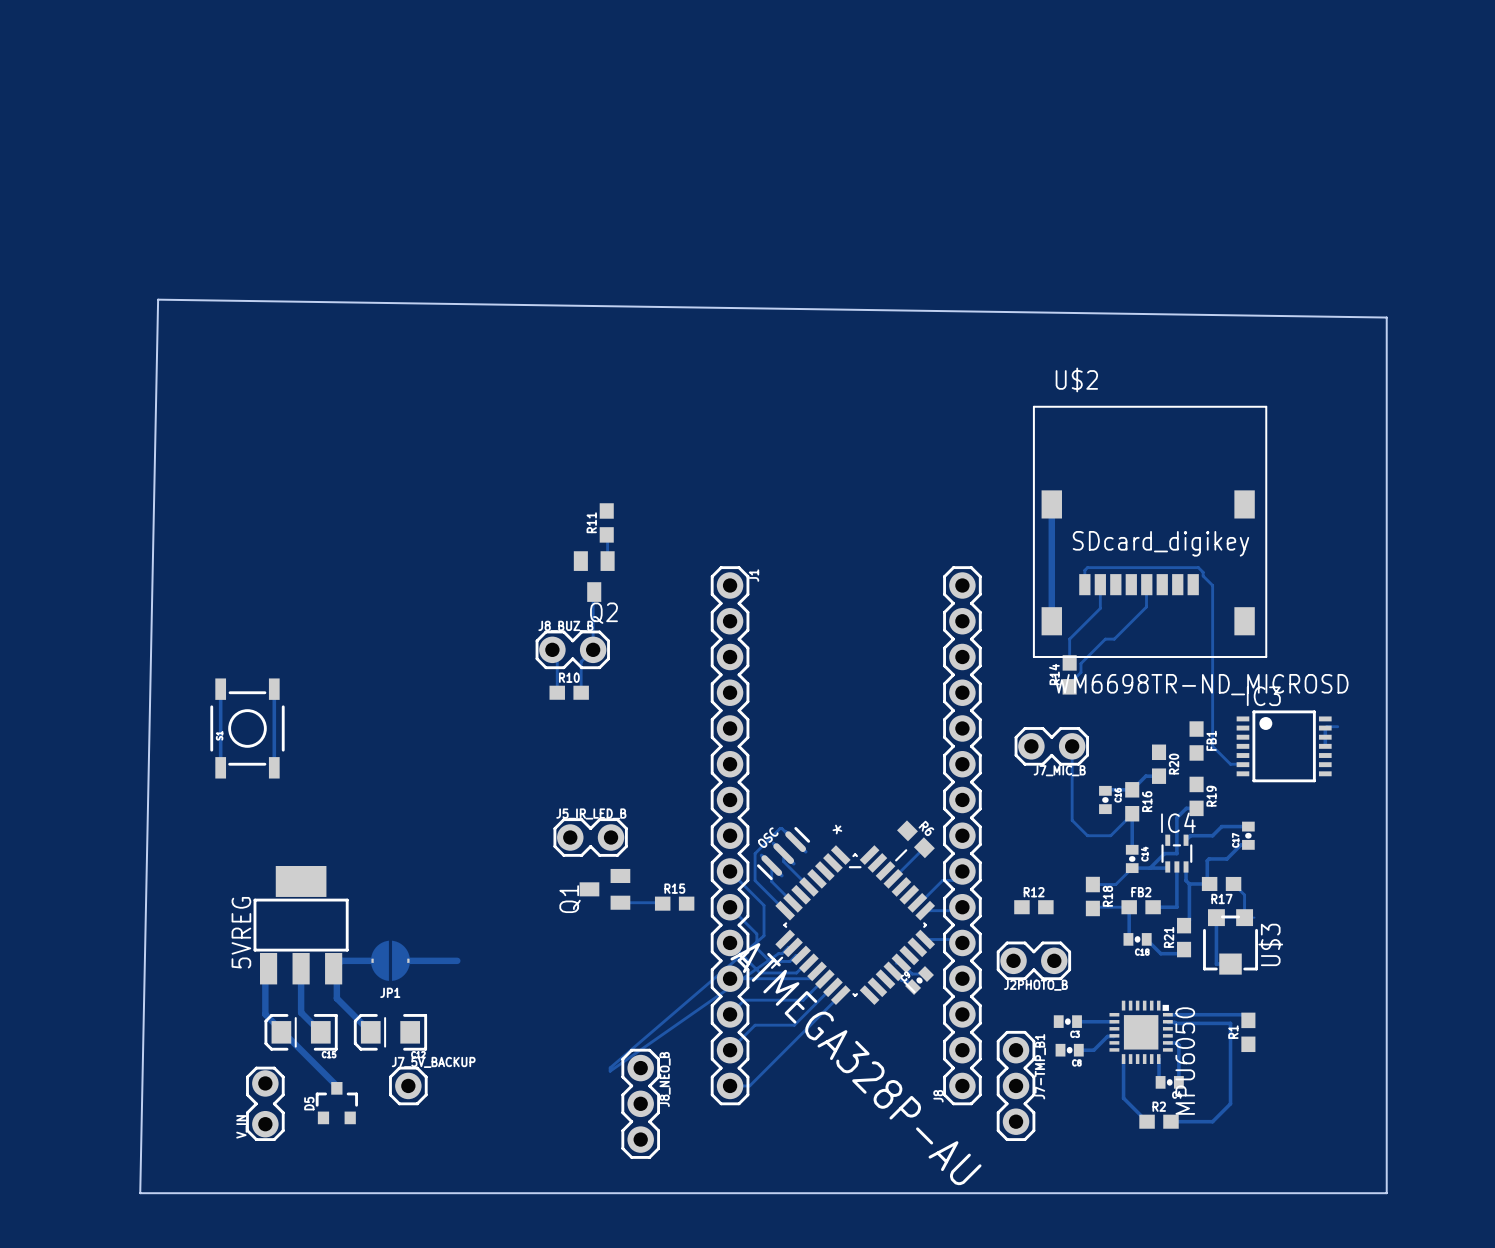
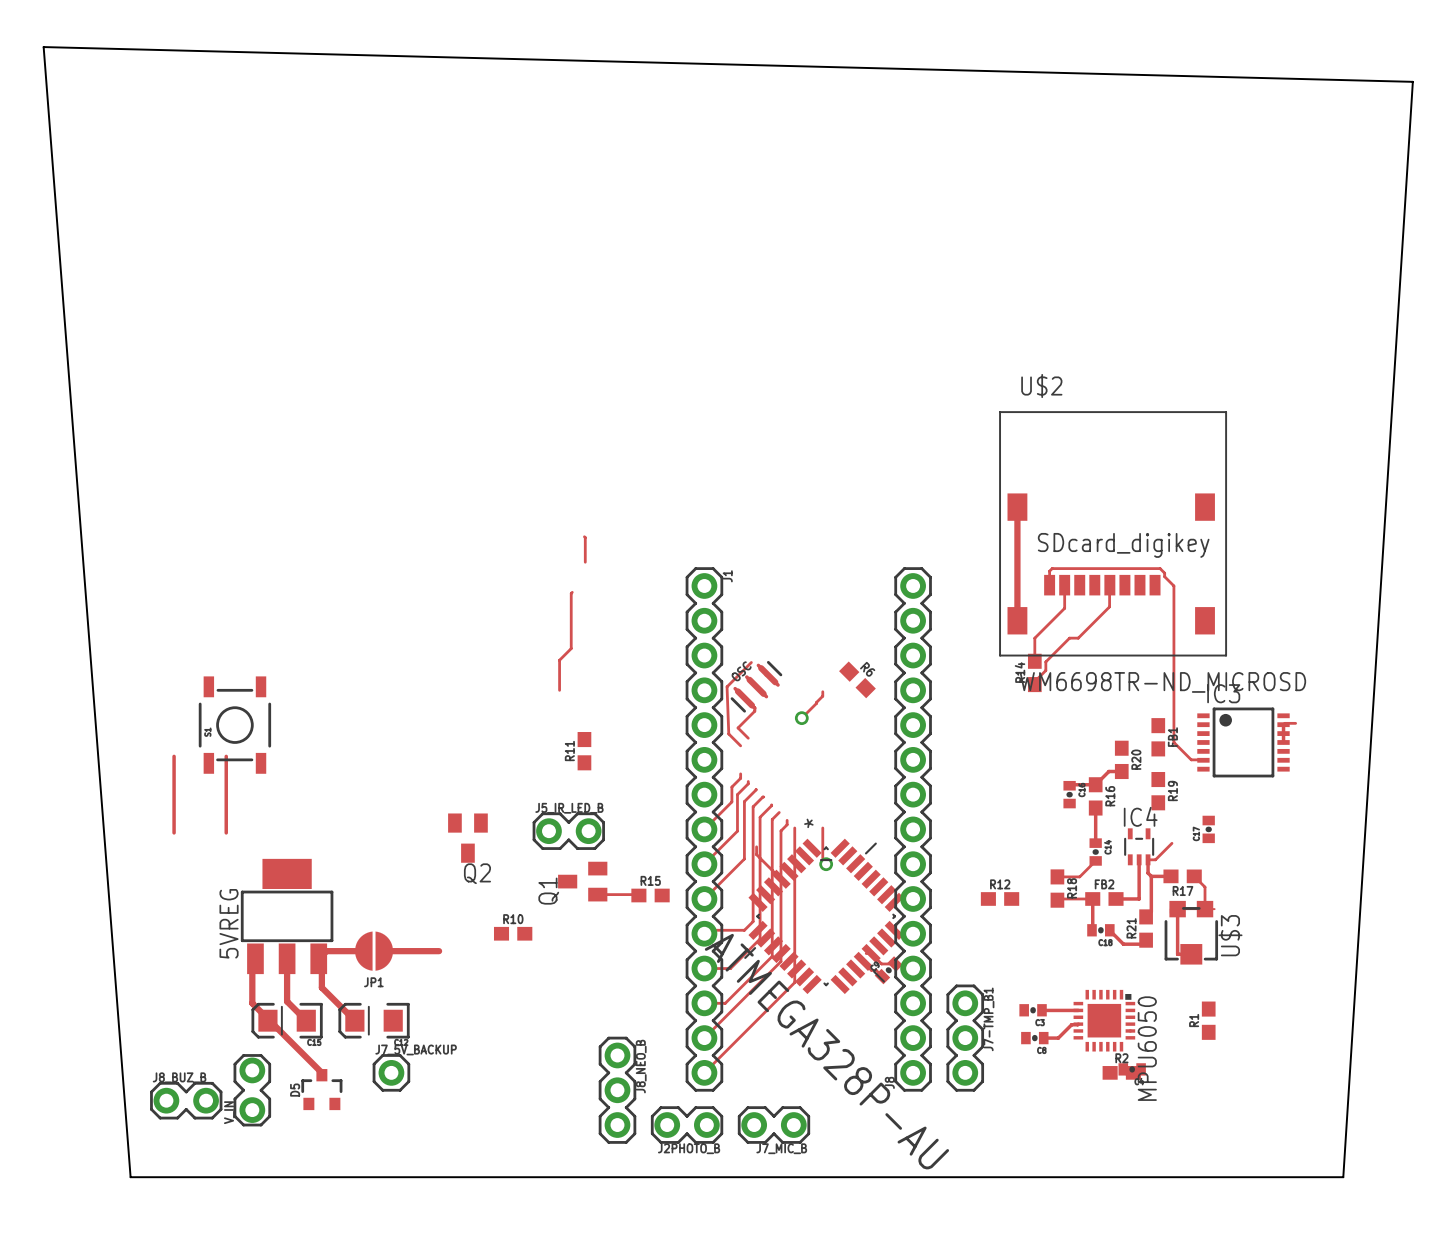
R11 position: (606, 522) -> (584, 751)
Q2 position: (594, 576) -> (467, 838)
track: (552, 649) (557, 654) (557, 692) -> none
J8_BUZ_B position: (572, 649) -> (186, 1100)
track: none -> (751, 662) (727, 686) (728, 733) (740, 745)
track: (220, 689) (220, 767) -> (174, 756) (174, 832)
track: (274, 689) (274, 767) -> (226, 756) (226, 832)
R10 position: (569, 692) -> (513, 933)
track: none -> (822, 691) (822, 696) (801, 718)
track: none -> (744, 698) (754, 707) (754, 711) (738, 727) (748, 738)
via: none -> (801, 718)
J7_MIC_B position: (1051, 746) -> (773, 1125)
track: (1072, 746) (1072, 820) (1087, 835) (1110, 835) (1132, 814) -> none
track: none -> (740, 773) (740, 778) (731, 787) (731, 801) (704, 829)
track: (1196, 808) (1186, 808) (1176, 817) (1176, 853) (1164, 853) (1150, 868) -> none
track: (1248, 826) (1221, 826) (1212, 835) (1190, 835) (1186, 840) -> none
track: none -> (822, 827) (822, 860) (826, 864)
J8 position: (962, 835) -> (913, 829)
R6 position: (915, 839) -> (857, 679)
track: (795, 841) (780, 828) (755, 853) (755, 880) (785, 910) -> none
track: (1248, 844) (1241, 844) (1226, 858) (1209, 858) (1207, 860) (1207, 881) (1209, 883) -> none
track: (924, 847) (893, 878) -> none
track: none -> (1171, 843) (1155, 859) (1148, 859)
OSC position: (783, 853) -> (756, 686)
track: (771, 865) (771, 881) (792, 902) -> none
track: (1167, 866) (1132, 868) -> none
track: (730, 871) (764, 905) (764, 935) (610, 1067) (610, 1071) (778, 953) (782, 953) (788, 947) (792, 947) -> (704, 864) (737, 831) (737, 794) (748, 781)
via: none -> (826, 864)
track: (962, 871) (953, 880) (942, 880) (920, 902) (917, 902) -> none
track: (730, 907) (756, 934) (756, 948) (770, 961) (789, 961) (796, 955) (801, 955) -> (704, 898) (744, 858) (744, 801) (756, 789)
track: (962, 907) (958, 910) (925, 910) -> none
track: (925, 939) (958, 939) (962, 942) -> none
track: (730, 942) (760, 972) (796, 972) (806, 963) (808, 963) -> (704, 933) (707, 930) (744, 930) (753, 921) (753, 806) (763, 797)
J2PHOTO_B position: (1033, 960) -> (687, 1125)
track: (817, 971) (809, 978) (756, 978) -> (771, 804) (760, 817) (760, 938) (730, 968)
track: (824, 979) (803, 1000) (744, 1000) (730, 1014) -> (779, 812) (772, 819) (772, 956) (725, 1003) (704, 1003)
track: (832, 987) (794, 1025) (755, 1025) -> (787, 820) (787, 824) (780, 830) (780, 961) (728, 1013)
track: (840, 995) (749, 1085) (730, 1085) -> (794, 827) (794, 982) (704, 1072)
track: (1167, 1014) (1242, 1014) (1248, 1020) -> none
track: (1167, 1021) (1230, 1023) (1230, 1103) (1212, 1121) (1170, 1121) -> none
track: (1168, 1043) (1176, 1043) (1178, 1045) (1178, 1082) -> none
track: (1123, 1059) (1123, 1098) (1147, 1121) -> none
track: (1158, 1059) (1160, 1082) -> none
J7-TMP_B1 position: (1016, 1085) -> (965, 1038)
R2 position: (1159, 1121) -> (1121, 1072)
board edge: (140, 1193) (158, 299) (1386, 317) (1386, 1193) -> (130, 1177) (43, 47) (1412, 81) (1343, 1177)

